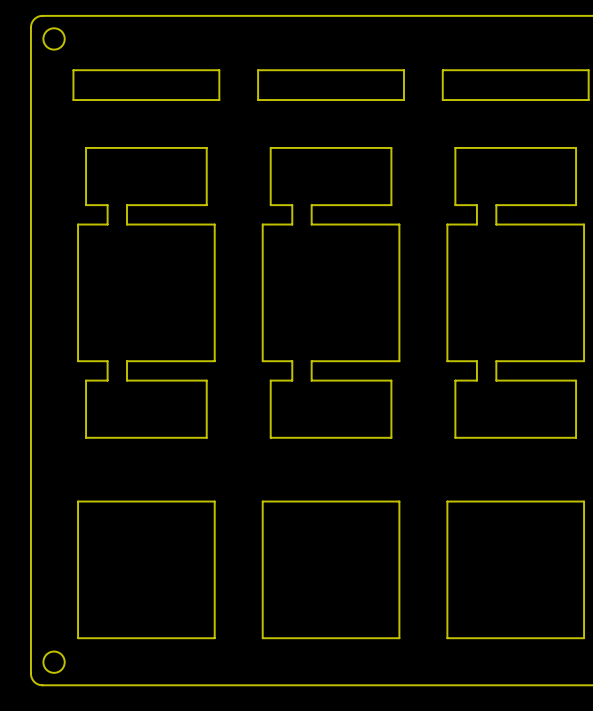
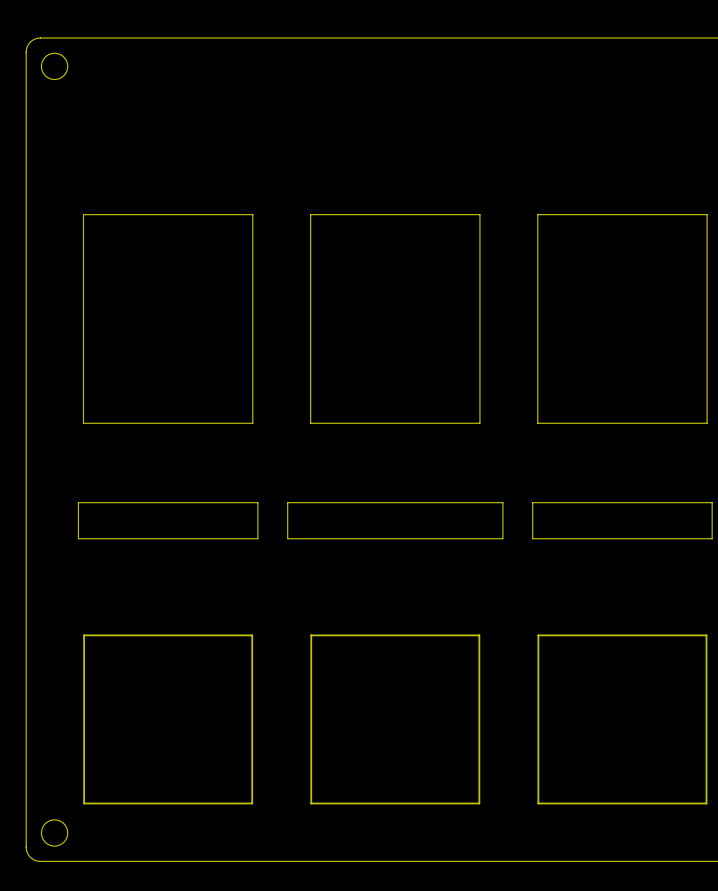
drawing: [73, 69, 220, 101] -> none
drawing: [257, 69, 405, 101] -> none
drawing: [442, 69, 589, 101] -> none
drawing: [77, 146, 216, 439] -> none
drawing: [261, 146, 401, 439] -> none
drawing: [446, 146, 586, 439] -> none
drawing: none -> [83, 214, 254, 424]
drawing: none -> [310, 214, 481, 424]
drawing: none -> [537, 214, 708, 424]
drawing: none -> [78, 502, 259, 540]
drawing: none -> [287, 502, 504, 540]
drawing: none -> [532, 502, 713, 540]

